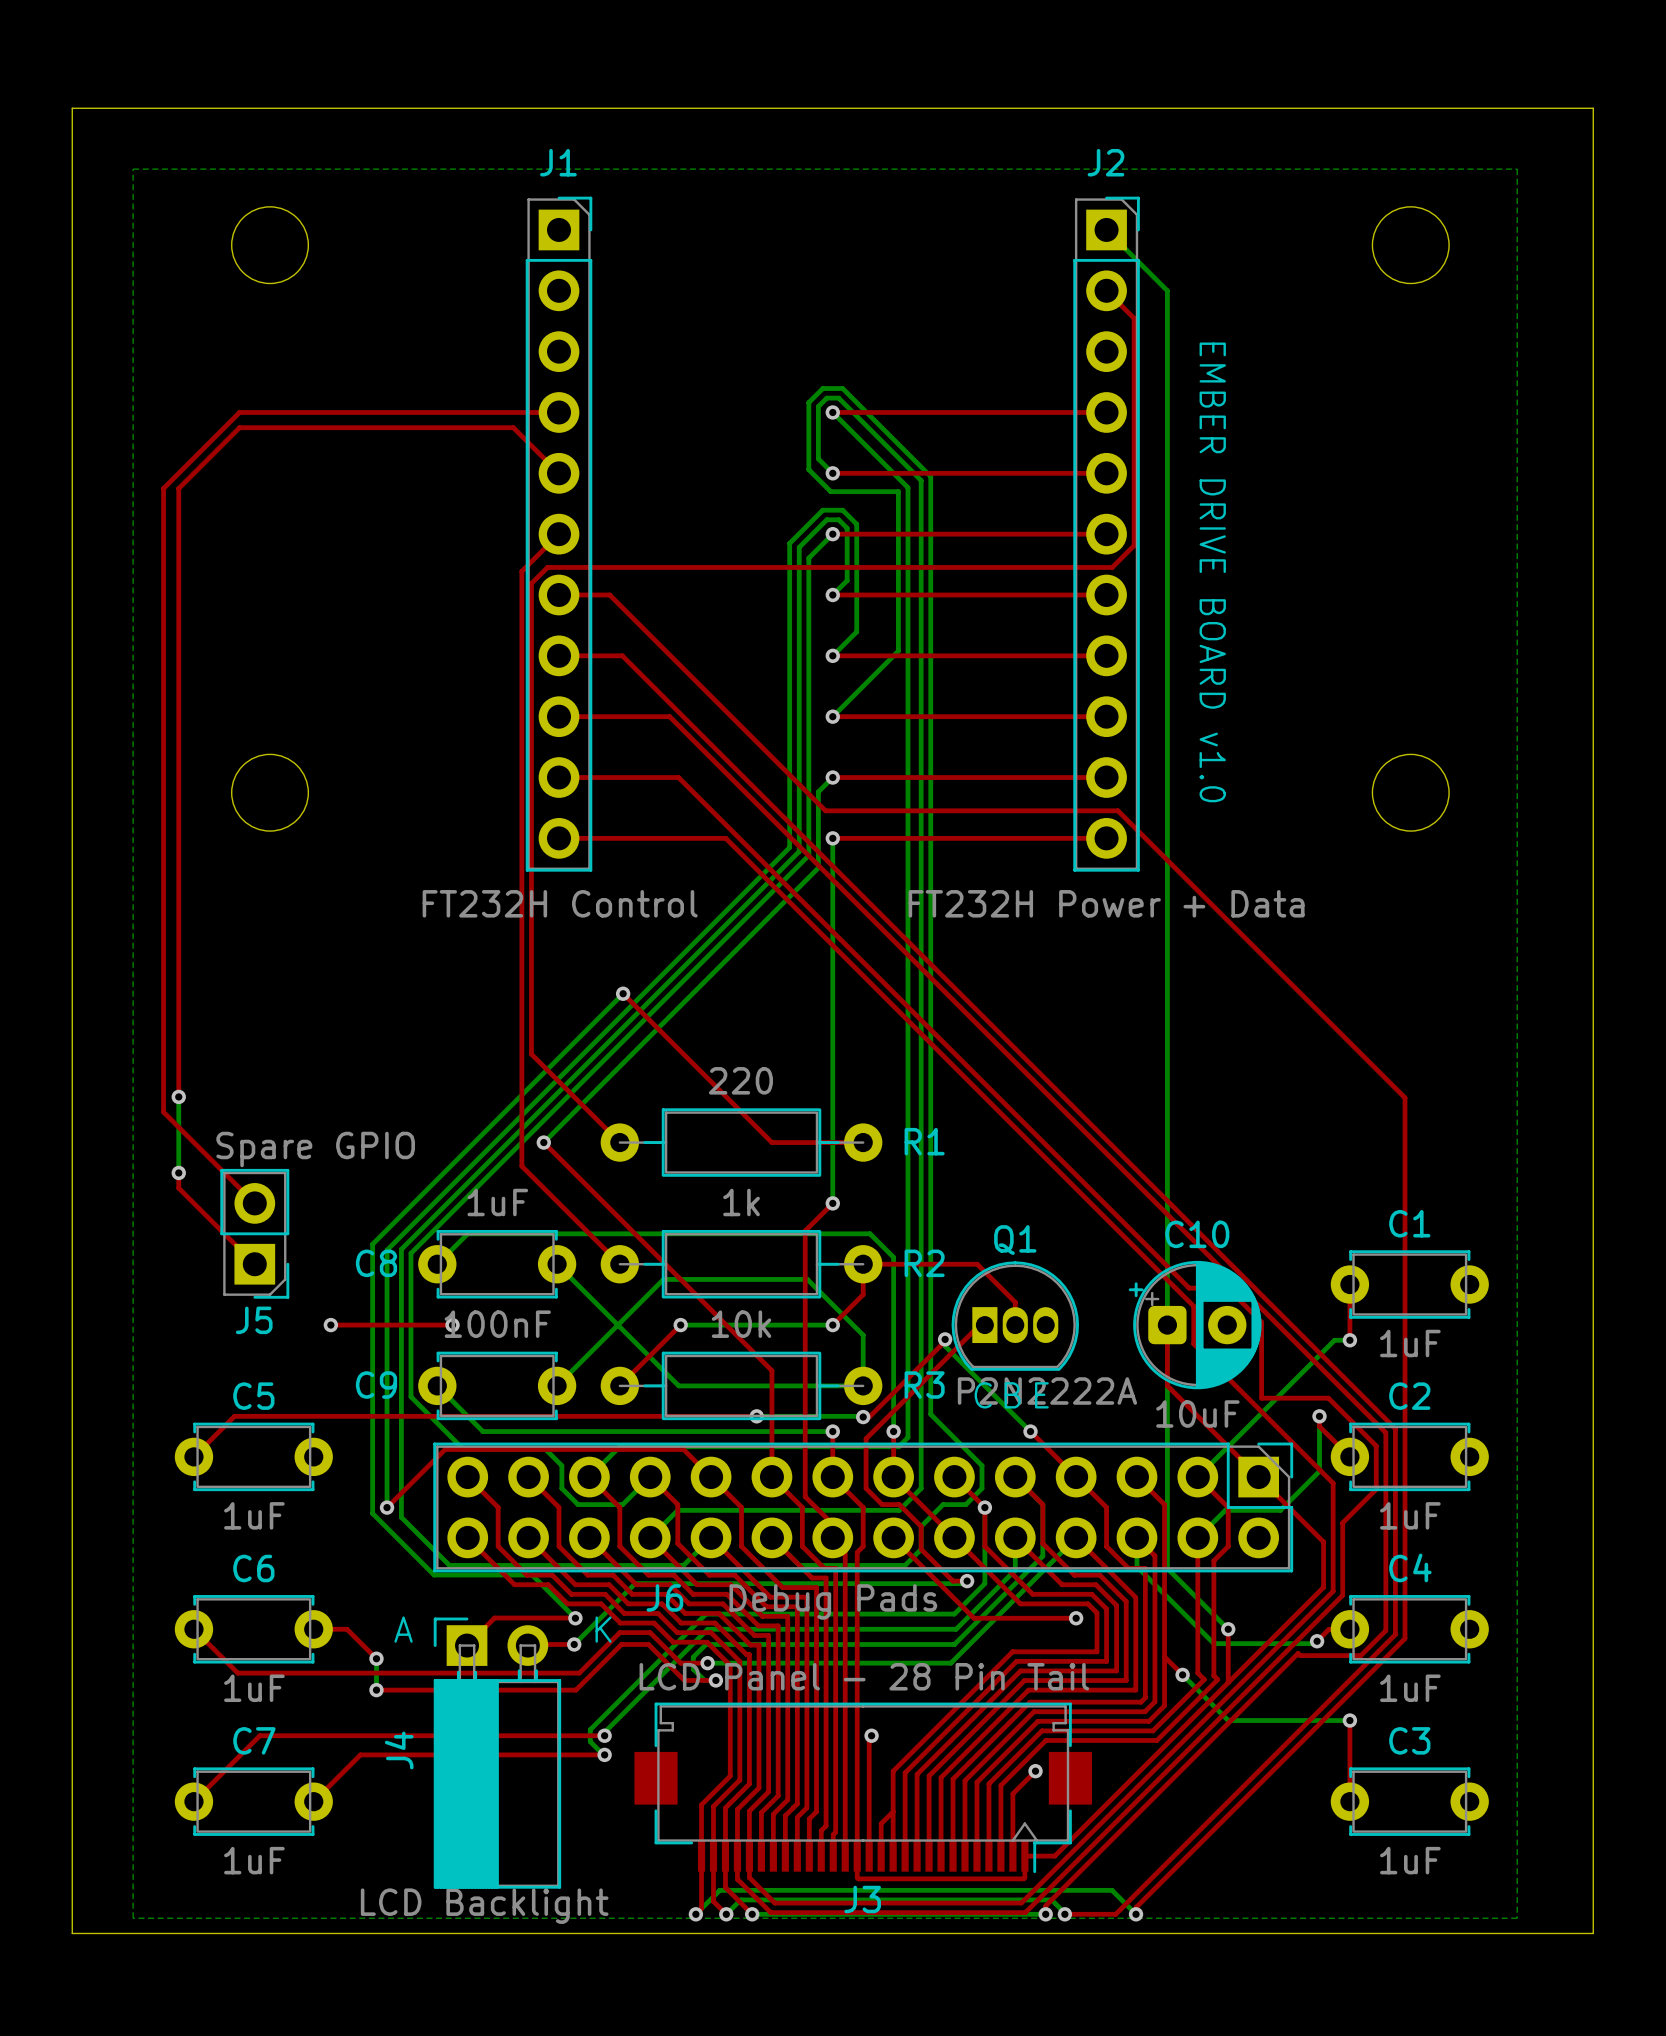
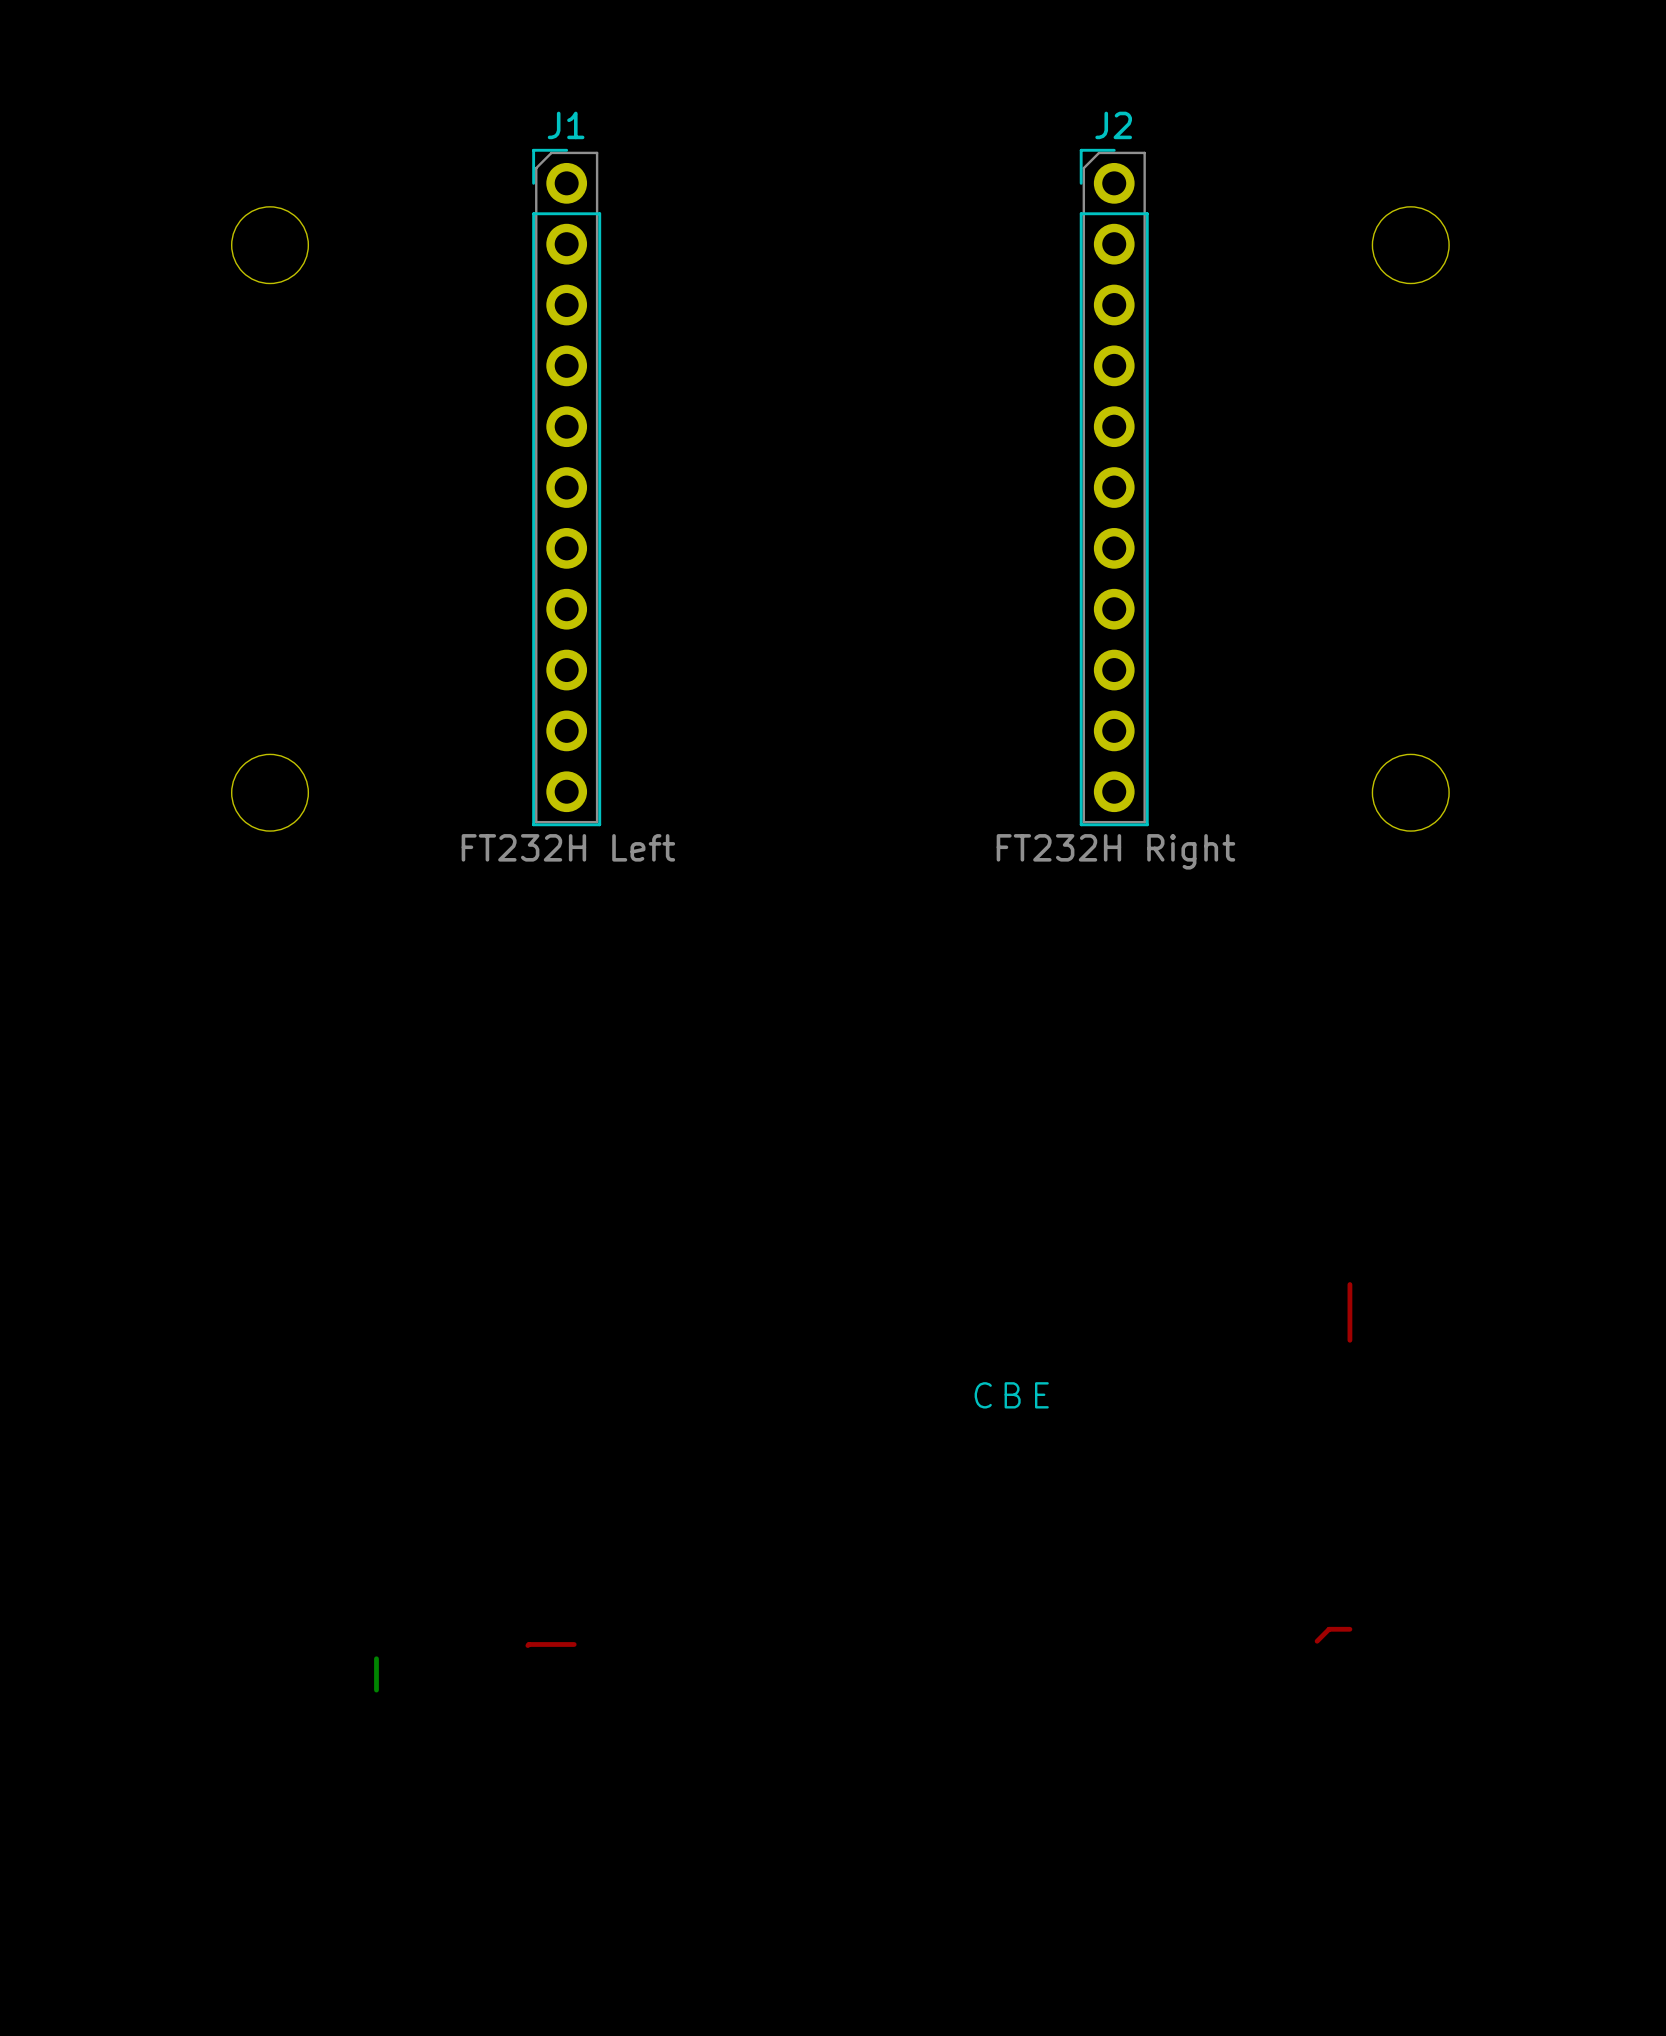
board edge: (72, 108) (1593, 108) (1593, 1933) (72, 1933) (72, 108) -> none
bottom zone outline: (133, 169) (1517, 169) (1517, 1918) (133, 1918) (133, 169) -> none
J1 footprint: [525, 196, 593, 872] -> [532, 148, 602, 827]
J2 footprint: [1073, 196, 1140, 872] -> [1079, 148, 1149, 827]
bottom track: (1106, 229) (1167, 290) (1167, 1568) (1228, 1629) -> none
top track: (1106, 290) (1134, 318) (1134, 545) (1112, 567) (547, 567) (531, 583) (531, 1054) (619, 1142) -> none
top track: (559, 412) (239, 412) (163, 488) (163, 1112) (254, 1203) -> none
top track: (832, 412) (1106, 412) -> none
bottom track: (832, 412) (907, 487) (907, 1437) (898, 1446) (619, 1446) (589, 1477) -> none
via: (832, 412) -> none
top track: (559, 473) (513, 427) (239, 427) (178, 488) (178, 1096) -> none
top track: (832, 473) (1106, 473) -> none
bottom track: (832, 473) (818, 458) (818, 406) (826, 398) (838, 398) (921, 480) (921, 1488) (899, 1510) (677, 1510) (650, 1537) -> none
via: (832, 473) -> none
top track: (559, 534) (521, 571) (521, 1166) (619, 1264) -> none
top track: (832, 534) (1106, 534) -> none
bottom track: (832, 534) (808, 558) (808, 855) (410, 1253) (410, 1396) (463, 1449) (545, 1449) (561, 1465) (561, 1488) (578, 1504) (622, 1504) (650, 1477) -> none
via: (832, 534) -> none
text: EMBER DRIVE BOARD v1.0 (1212, 572) -> none
top track: (559, 595) (609, 595) (825, 810) (1117, 810) (1405, 1097) (1405, 1638) (1136, 1907) (1136, 1914) -> none
top track: (832, 595) (1106, 595) -> none
bottom track: (832, 595) (847, 580) (847, 528) (838, 519) (826, 519) (799, 547) (799, 851) (401, 1249) (401, 1517) (449, 1565) (683, 1565) (711, 1537) -> none
via: (832, 595) -> none
top track: (559, 655) (622, 655) (1395, 1428) (1395, 1634) (1115, 1914) (1064, 1914) -> none
top track: (832, 655) (1106, 655) -> none
bottom track: (832, 655) (856, 631) (856, 524) (842, 510) (822, 510) (789, 543) (789, 847) (387, 1250) (387, 1507) -> none
via: (832, 655) -> none
top track: (559, 716) (669, 716) (1385, 1432) (1385, 1630) (1360, 1655) (1300, 1655) (1298, 1653) (1045, 1905) (1045, 1914) -> none
top track: (832, 716) (1106, 716) -> none
bottom track: (832, 716) (898, 651) (898, 491) (830, 491) (808, 469) (808, 402) (822, 388) (842, 388) (930, 476) (930, 1414) (982, 1465) (982, 1488) (965, 1504) (943, 1504) (921, 1526) (921, 1549) (905, 1565) (799, 1565) (771, 1537) -> none
via: (832, 716) -> none
top track: (559, 777) (678, 777) (1189, 1288) (1227, 1288) (1261, 1322) (1261, 1398) (1328, 1398) (1376, 1445) (1376, 1489) (1342, 1522) (1342, 1595) (1025, 1912) (770, 1912) (737, 1879) (737, 1809) (759, 1787) (759, 1645) (750, 1645) (718, 1613) (685, 1613) (666, 1594) (632, 1594) (613, 1575) (587, 1575) (559, 1546) (559, 1507) (528, 1477) -> none
top track: (832, 777) (1106, 777) -> none
bottom track: (832, 777) (818, 791) (818, 867) (543, 1142) -> none
via: (832, 777) -> none
top track: (559, 838) (725, 838) (1193, 1306) (1193, 1343) (1333, 1483) (1333, 1591) (1021, 1903) (774, 1903) (749, 1877) (749, 1811) (768, 1791) (768, 1635) (754, 1635) (722, 1603) (689, 1603) (670, 1584) (636, 1584) (589, 1537) -> none
top track: (832, 838) (1106, 838) -> none
bottom track: (832, 838) (832, 1203) -> none
via: (832, 838) -> none
J1 value: FT232H Control (560, 903) -> FT232H Left (568, 847)
J2 value: FT232H Power + Data (1106, 903) -> FT232H Right (1115, 851)
top track: (623, 993) (771, 1142) (863, 1142) -> none
bottom track: (623, 993) (372, 1244) (372, 1513) (434, 1575) (532, 1575) (575, 1618) -> none
via: (623, 993) -> none
bottom track: (178, 1096) (178, 1172) -> none
via: (178, 1096) -> none
top track: (543, 1142) (771, 1370) (771, 1477) (802, 1507) (802, 1546) (824, 1568) (835, 1568) (835, 1832) (833, 1834) (833, 1856) -> none
via: (543, 1142) -> none
R1: 220 (741, 1142) -> none
top track: (178, 1172) (178, 1188) (254, 1264) -> none
via: (178, 1172) -> none
top track: (832, 1203) (805, 1230) (805, 1496) (832, 1524) (832, 1537) (845, 1550) (845, 1856) -> none
via: (832, 1203) -> none
J5: Spare GPIO (254, 1233) -> none
bottom track: (437, 1264) (467, 1233) (870, 1233) (893, 1257) (893, 1431) -> none
C8: 1uF (497, 1264) -> none
bottom track: (557, 1264) (678, 1385) (863, 1385) (863, 1335) (807, 1279) (663, 1279) (557, 1385) -> none
R2: 1k (741, 1264) -> none
C1: 1uF (1409, 1284) -> none
Q1: P2N2222A (1015, 1316) -> none
top track: (330, 1325) (452, 1325) -> none
via: (330, 1325) -> none
via: (452, 1325) -> none
top track: (680, 1325) (619, 1385) -> none
bottom track: (680, 1325) (832, 1325) -> none
via: (680, 1325) -> none
top track: (832, 1325) (863, 1294) (863, 1264) (977, 1264) (1015, 1302) (1015, 1325) -> none
via: (832, 1325) -> none
top track: (984, 1325) (979, 1325) (866, 1438) (866, 1488) (882, 1504) (899, 1504) (921, 1526) (921, 1549) (952, 1581) (967, 1581) -> none
top track: (1167, 1325) (1167, 1385) (1323, 1541) (1323, 1587) (1054, 1856) (1024, 1856) (1023, 1878) (857, 1877) (857, 1552) (863, 1546) (863, 1507) (832, 1477) (832, 1431) -> none
C10: 10uF (1195, 1325) -> none
top track: (945, 1339) (869, 1417) (863, 1417) -> none
bottom track: (945, 1339) (945, 1346) (1030, 1431) -> none
via: (945, 1339) -> none
bottom track: (1349, 1340) (1334, 1340) (1197, 1477) -> none
via: (1349, 1340) -> none
bottom track: (437, 1385) (482, 1431) (832, 1431) -> none
C9: 100nF (497, 1385) -> none
R3: 10k (741, 1385) -> none
top track: (756, 1416) (234, 1416) (193, 1456) -> none
bottom track: (756, 1416) (863, 1417) -> none
via: (756, 1416) -> none
top track: (1319, 1416) (1319, 1426) (1349, 1456) -> none
bottom track: (1319, 1416) (1319, 1471) (1280, 1510) (1225, 1510) (1197, 1537) -> none
via: (1319, 1416) -> none
via: (863, 1417) -> none
via: (832, 1431) -> none
top track: (893, 1431) (893, 1477) (1020, 1603) (1087, 1603) (1096, 1612) (1096, 1651) (1012, 1651) (893, 1771) (893, 1856) -> none
via: (893, 1431) -> none
top track: (1030, 1431) (1106, 1507) (1106, 1546) (1128, 1568) (1145, 1568) (1145, 1697) (1141, 1702) (1030, 1702) (953, 1779) (953, 1856) -> none
via: (1030, 1431) -> none
C5: 1uF (253, 1456) -> none
C2: 1uF (1409, 1456) -> none
top track: (467, 1477) (498, 1507) (498, 1546) (526, 1575) (552, 1575) (571, 1594) (605, 1594) (624, 1613) (658, 1613) (677, 1632) (710, 1632) (739, 1661) (739, 1780) (713, 1806) (713, 1901) (726, 1914) -> none
top track: (589, 1477) (619, 1507) (619, 1546) (648, 1575) (673, 1575) (693, 1594) (726, 1594) (758, 1625) (778, 1625) (778, 1795) (761, 1812) (761, 1856) -> none
top track: (650, 1477) (677, 1504) (677, 1543) (709, 1575) (734, 1575) (766, 1606) (797, 1606) (797, 1803) (785, 1815) (785, 1856) -> none
top track: (954, 1477) (984, 1507) (984, 1546) (1032, 1594) (1091, 1594) (1106, 1608) (1106, 1661) (1016, 1661) (905, 1772) (905, 1856) -> none
top track: (1015, 1477) (1042, 1504) (1042, 1543) (1074, 1575) (1099, 1575) (1126, 1601) (1126, 1680) (1024, 1680) (929, 1776) (929, 1856) -> none
bottom track: (1015, 1477) (1042, 1504) (1042, 1556) (954, 1644) (705, 1644) (693, 1657) (693, 1669) (704, 1680) (715, 1680) -> none
top track: (1136, 1477) (1164, 1504) (1164, 1705) (1148, 1721) (1037, 1721) (976, 1782) (976, 1856) -> none
top track: (1197, 1477) (1228, 1507) (1228, 1546) (1213, 1560) (1213, 1675) (1217, 1679) (1156, 1740) (1045, 1740) (1000, 1785) (1000, 1856) -> none
top track: (387, 1507) (445, 1449) (683, 1449) (741, 1507) (741, 1546) (782, 1587) (816, 1587) (816, 1811) (809, 1818) (809, 1856) -> none
via: (387, 1507) -> none
J6: Debug Pads (863, 1507) -> none
bottom track: (984, 1507) (984, 1583) (954, 1614) (705, 1614) (590, 1729) (590, 1741) (604, 1754) -> none
via: (984, 1507) -> none
top track: (467, 1537) (514, 1584) (548, 1584) (567, 1603) (601, 1603) (620, 1623) (654, 1623) (673, 1642) (707, 1642) (730, 1665) (730, 1776) (701, 1804) (701, 1908) (695, 1914) -> none
top track: (528, 1537) (575, 1584) (609, 1584) (628, 1603) (662, 1603) (681, 1623) (714, 1623) (746, 1654) (749, 1654) (749, 1784) (725, 1807) (725, 1887) (752, 1914) -> none
top track: (650, 1537) (697, 1584) (730, 1584) (762, 1616) (787, 1616) (787, 1799) (773, 1814) (773, 1856) -> none
top track: (711, 1537) (770, 1597) (806, 1597) (806, 1807) (797, 1817) (797, 1856) -> none
top track: (771, 1537) (812, 1578) (826, 1578) (826, 1825) (821, 1830) (821, 1856) -> none
top track: (893, 1537) (973, 1618) (1076, 1618) -> none
top track: (1015, 1537) (1062, 1584) (1095, 1584) (1116, 1605) (1116, 1670) (1020, 1670) (917, 1774) (917, 1856) -> none
bottom track: (1015, 1537) (1015, 1570) (956, 1629) (707, 1629) (604, 1732) (604, 1735) -> none
top track: (1076, 1537) (1135, 1597) (1135, 1690) (1028, 1690) (941, 1777) (941, 1856) -> none
bottom track: (1076, 1537) (950, 1663) (707, 1663) -> none
top track: (1136, 1537) (1154, 1555) (1154, 1701) (1145, 1711) (1034, 1711) (965, 1780) (965, 1856) -> none
bottom track: (1136, 1537) (1136, 1566) (1213, 1643) (1314, 1643) (1317, 1641) -> none
top track: (1197, 1537) (1197, 1673) (1204, 1679) (1152, 1730) (1041, 1730) (988, 1783) (988, 1856) -> none
bottom track: (967, 1581) (964, 1583) (635, 1583) (573, 1645) -> none
via: (967, 1581) -> none
top track: (575, 1618) (494, 1618) (467, 1645) -> none
via: (575, 1618) -> none
via: (1076, 1618) -> none
top track: (193, 1629) (237, 1673) (579, 1673) (619, 1632) (650, 1632) (680, 1663) (707, 1663) -> none
C6: 1uF (253, 1629) -> none
top track: (313, 1629) (347, 1629) (376, 1658) -> none
text: A (403, 1629) -> none
text: K (603, 1629) -> none
top track: (1228, 1629) (1228, 1682) -> none
via: (1228, 1629) -> none
C4: 1uF (1409, 1629) -> none
via: (1317, 1641) -> none
via: (574, 1644) -> none
top track: (1164, 1656) (1182, 1674) -> none
via: (376, 1658) -> none
via: (707, 1663) -> none
bottom track: (1182, 1674) (1228, 1720) (1349, 1720) -> none
via: (1182, 1674) -> none
top track: (715, 1680) (684, 1680) (648, 1644) (621, 1644) (575, 1690) (376, 1690) -> none
via: (715, 1680) -> none
via: (376, 1690) -> none
top track: (1349, 1720) (1349, 1801) -> none
via: (1349, 1720) -> none
top track: (604, 1735) (259, 1735) (193, 1801) -> none
via: (604, 1735) -> none
top track: (871, 1735) (869, 1738) (869, 1856) -> none
via: (871, 1735) -> none
J4: LCD Backlight (497, 1753) -> none
top track: (604, 1754) (360, 1754) (313, 1801) -> none
via: (604, 1754) -> none
top track: (1035, 1771) (1012, 1793) (1012, 1856) -> none
via: (1035, 1771) -> none
J3: LCD Panel - 28 Pin Tail (863, 1787) -> none
C7: 1uF (253, 1801) -> none
C3: 1uF (1409, 1801) -> none
top track: (893, 1811) (881, 1823) (881, 1856) -> none
bottom track: (695, 1914) (719, 1890) (1112, 1890) (1136, 1914) -> none
via: (695, 1914) -> none
bottom track: (726, 1914) (740, 1899) (1051, 1899) (1064, 1914) -> none
via: (726, 1914) -> none
bottom track: (752, 1914) (1045, 1914) -> none
via: (752, 1914) -> none
via: (1045, 1914) -> none
via: (1064, 1914) -> none
via: (1136, 1914) -> none

